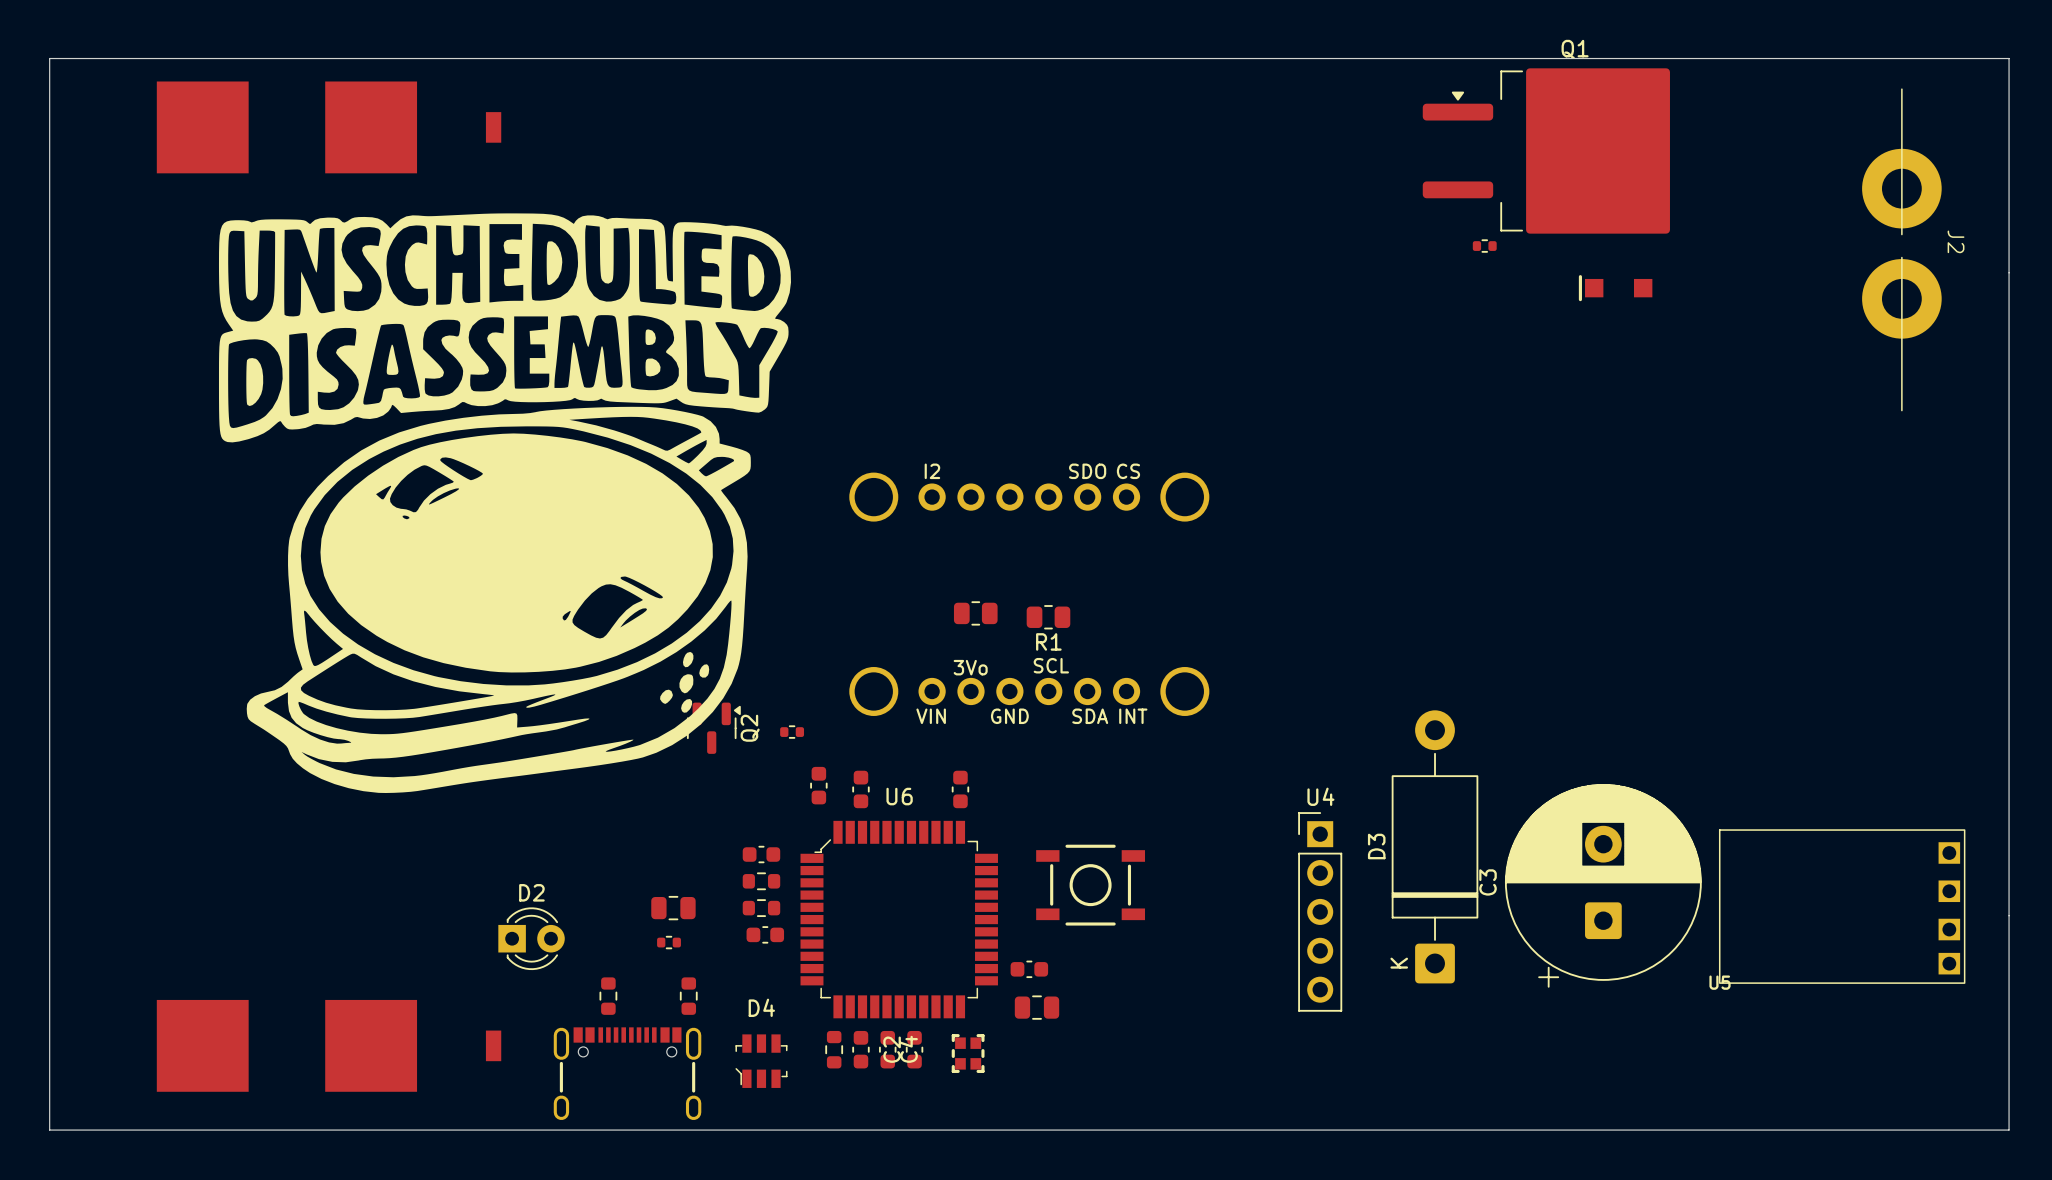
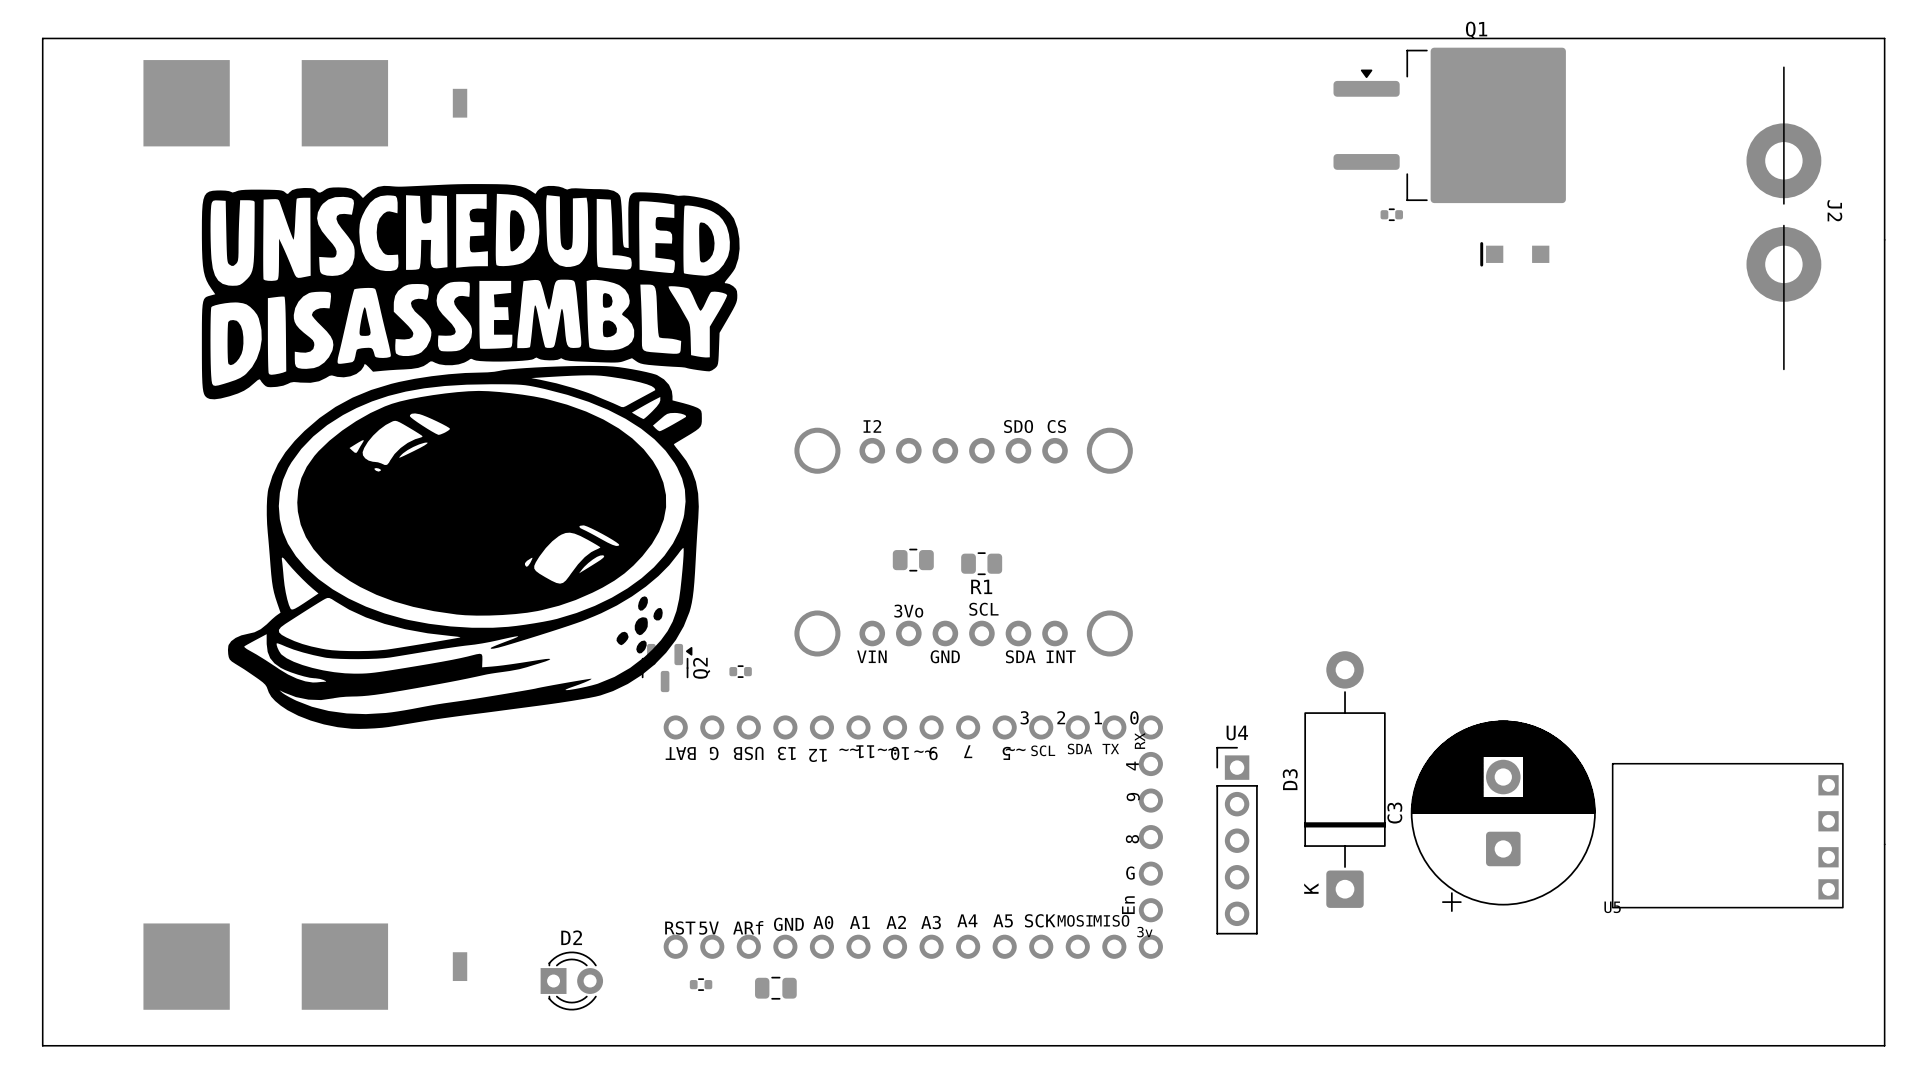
part: (818, 785) -> none
part: (860, 789) -> none
part: (960, 789) -> none
part: (761, 854) -> none
part: (761, 881) -> none
part: (1090, 885) -> none
part: (673, 908) -> none
part: (761, 908) -> none
part: none -> (913, 837)
U6: (899, 919) -> none
part: (765, 934) -> none
D2 position: (531, 938) -> (571, 981)
part position: (669, 942) -> (701, 984)
part: (1029, 969) -> none
part: (608, 996) -> none
part: (688, 996) -> none
part: (1037, 1007) -> none
part: (834, 1049) -> none
part: (860, 1049) -> none
C4: (887, 1049) -> none
C2: (914, 1049) -> none
part: (968, 1053) -> none
D4: (761, 1061) -> none
part: none -> (775, 988)
part: (627, 1073) -> none

